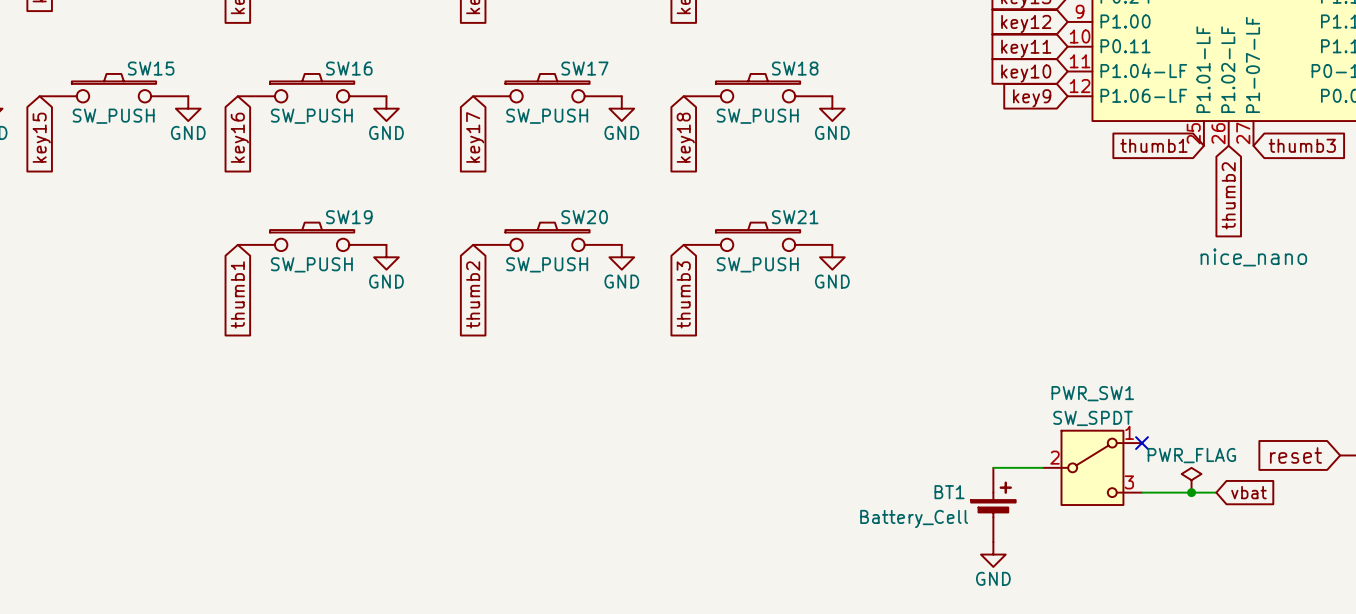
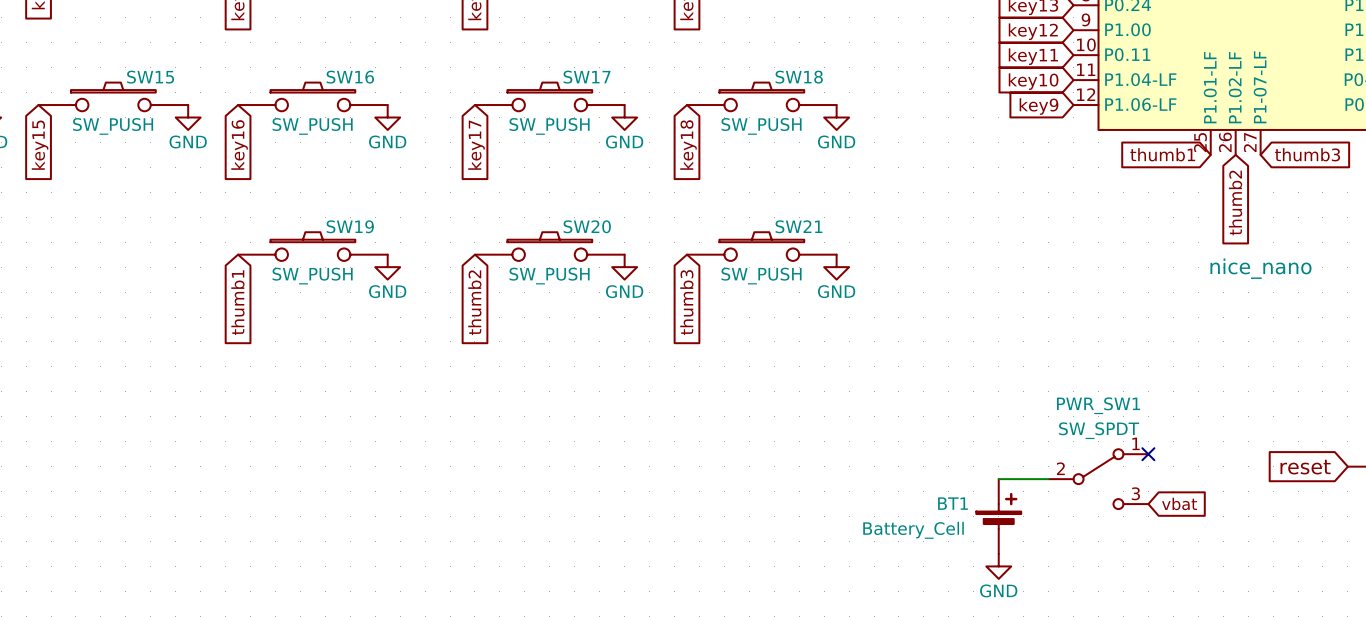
PWR_SW1 symbol: [1042, 430, 1143, 506] -> [1048, 449, 1149, 510]
power symbol: PWR_FLAG (1191, 480) -> none
wire: (1142, 492) (1216, 492) -> none
junction: (1191, 492) -> none
global label position: vbat (1248, 492) -> vbat (1179, 503)

